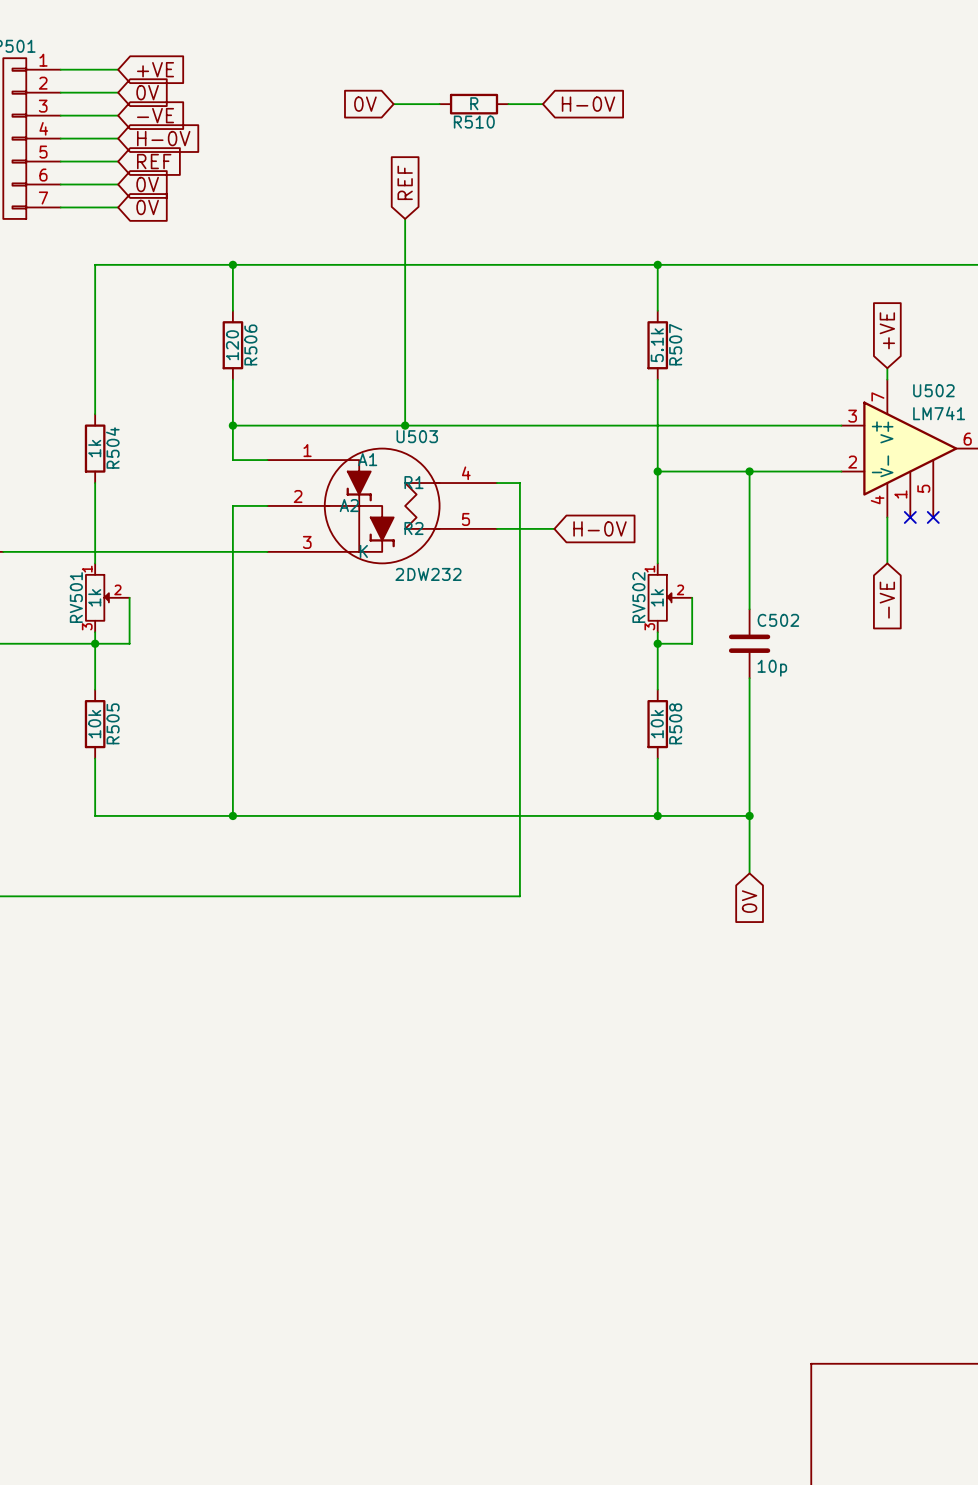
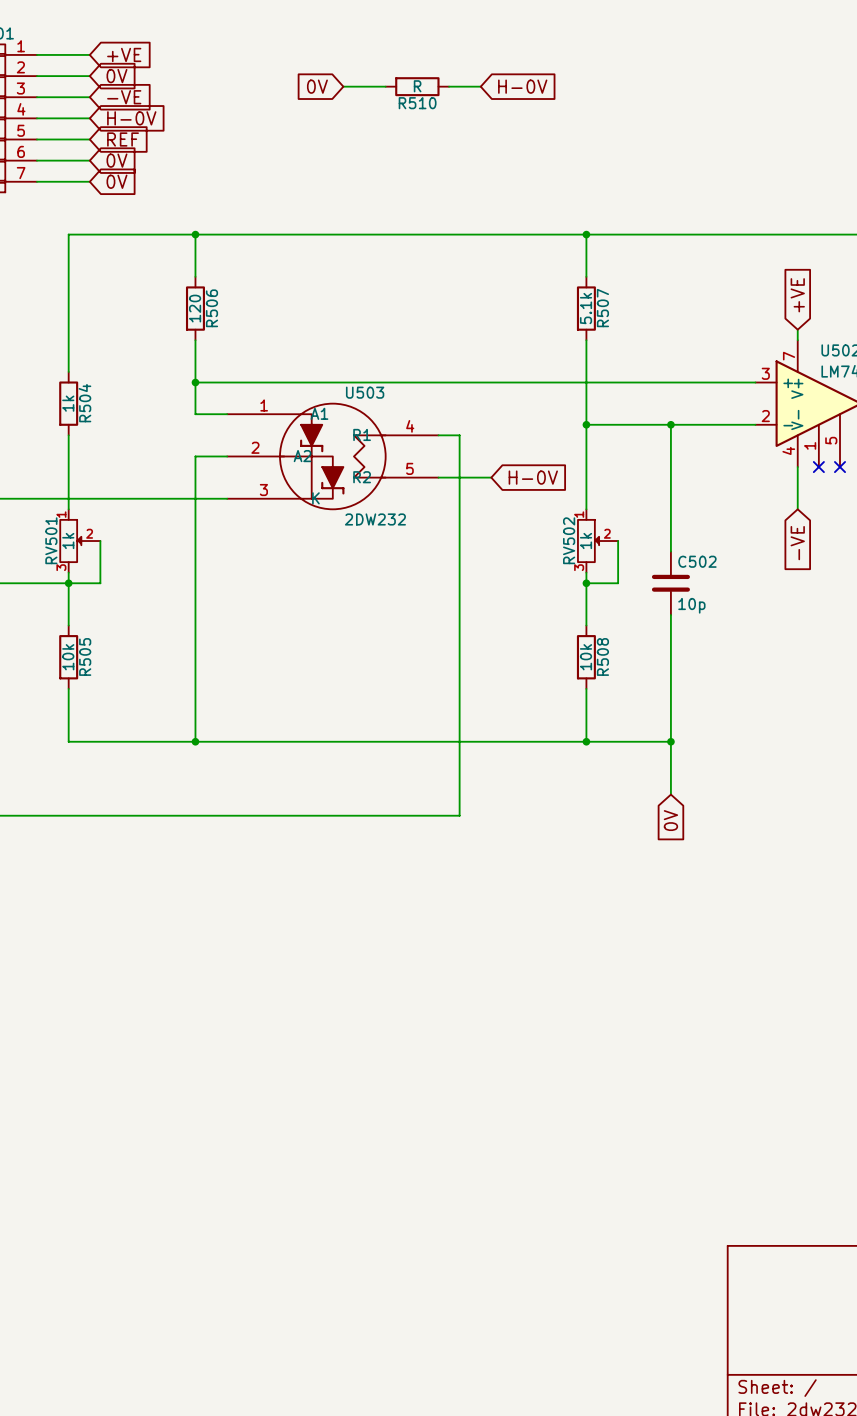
global label: REF (405, 182) -> none
wire: (405, 218) (405, 425) -> none
junction: (405, 425) -> none

